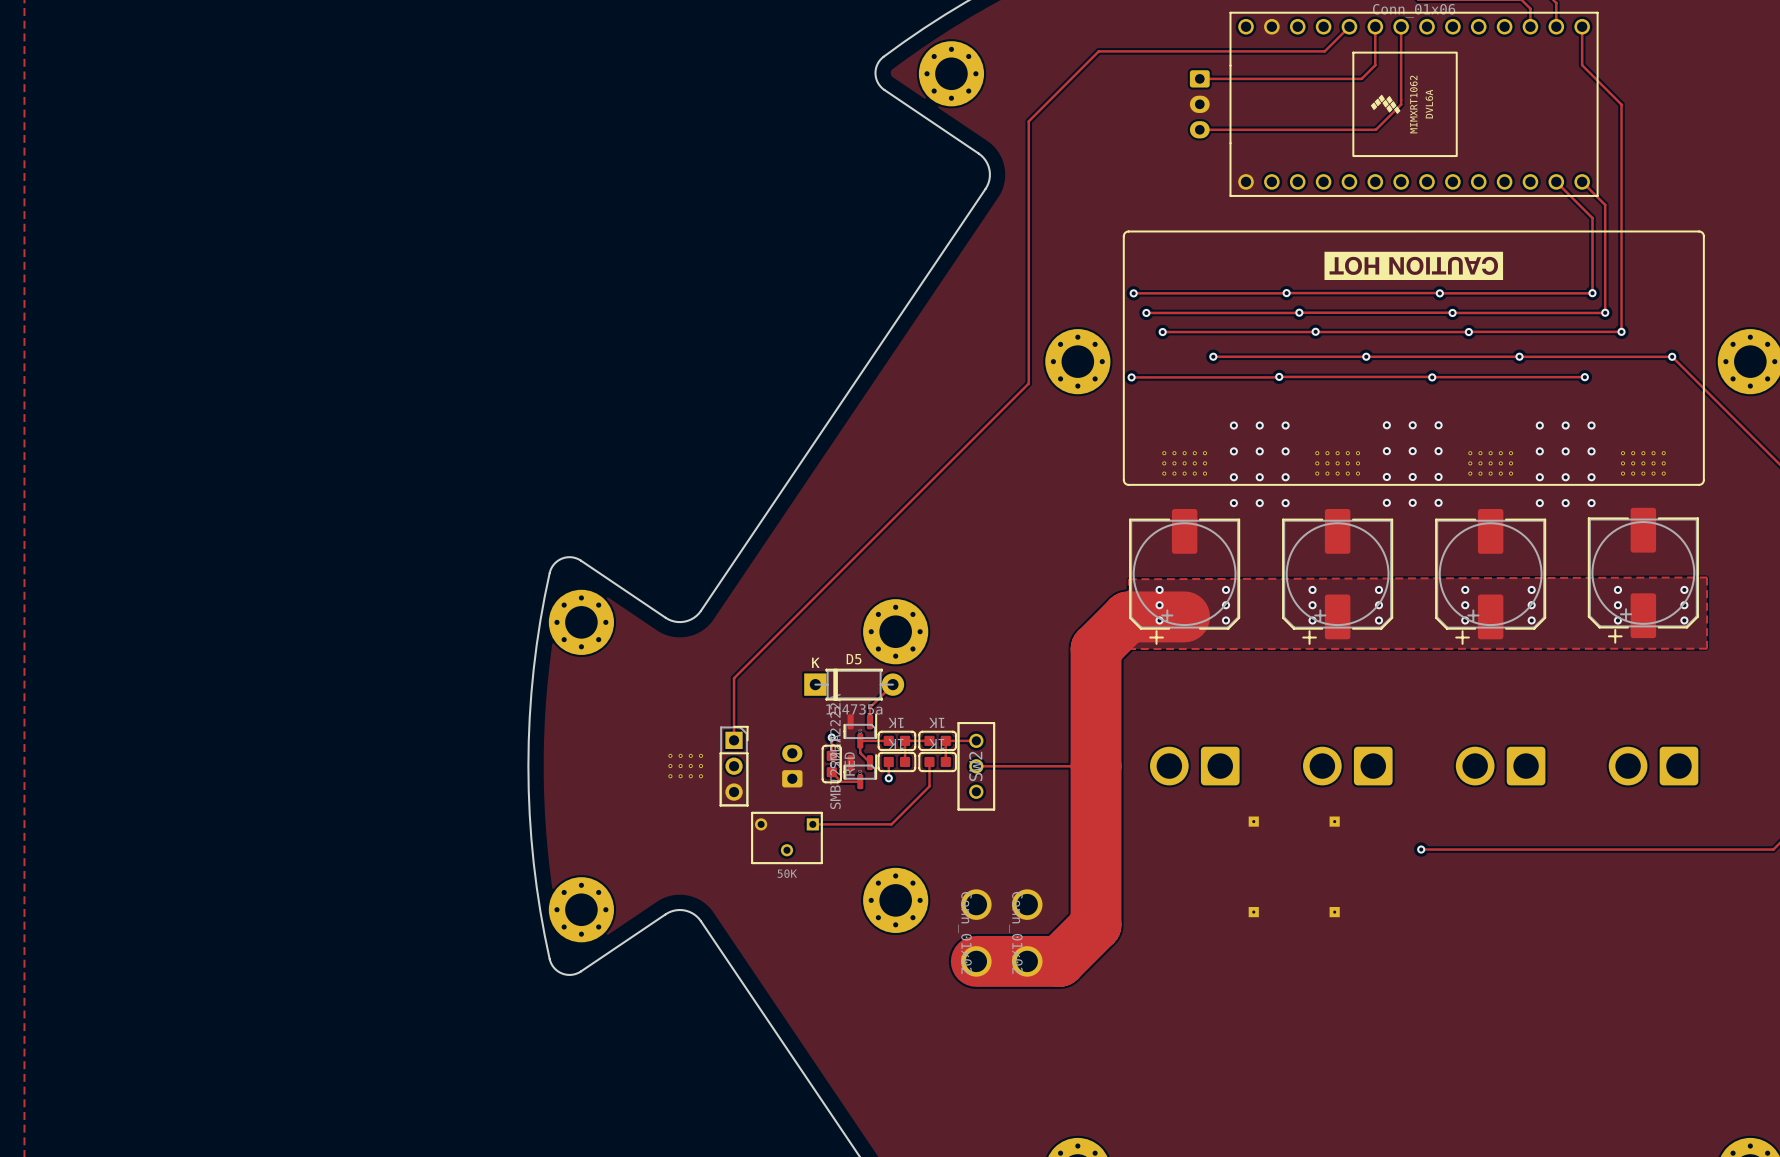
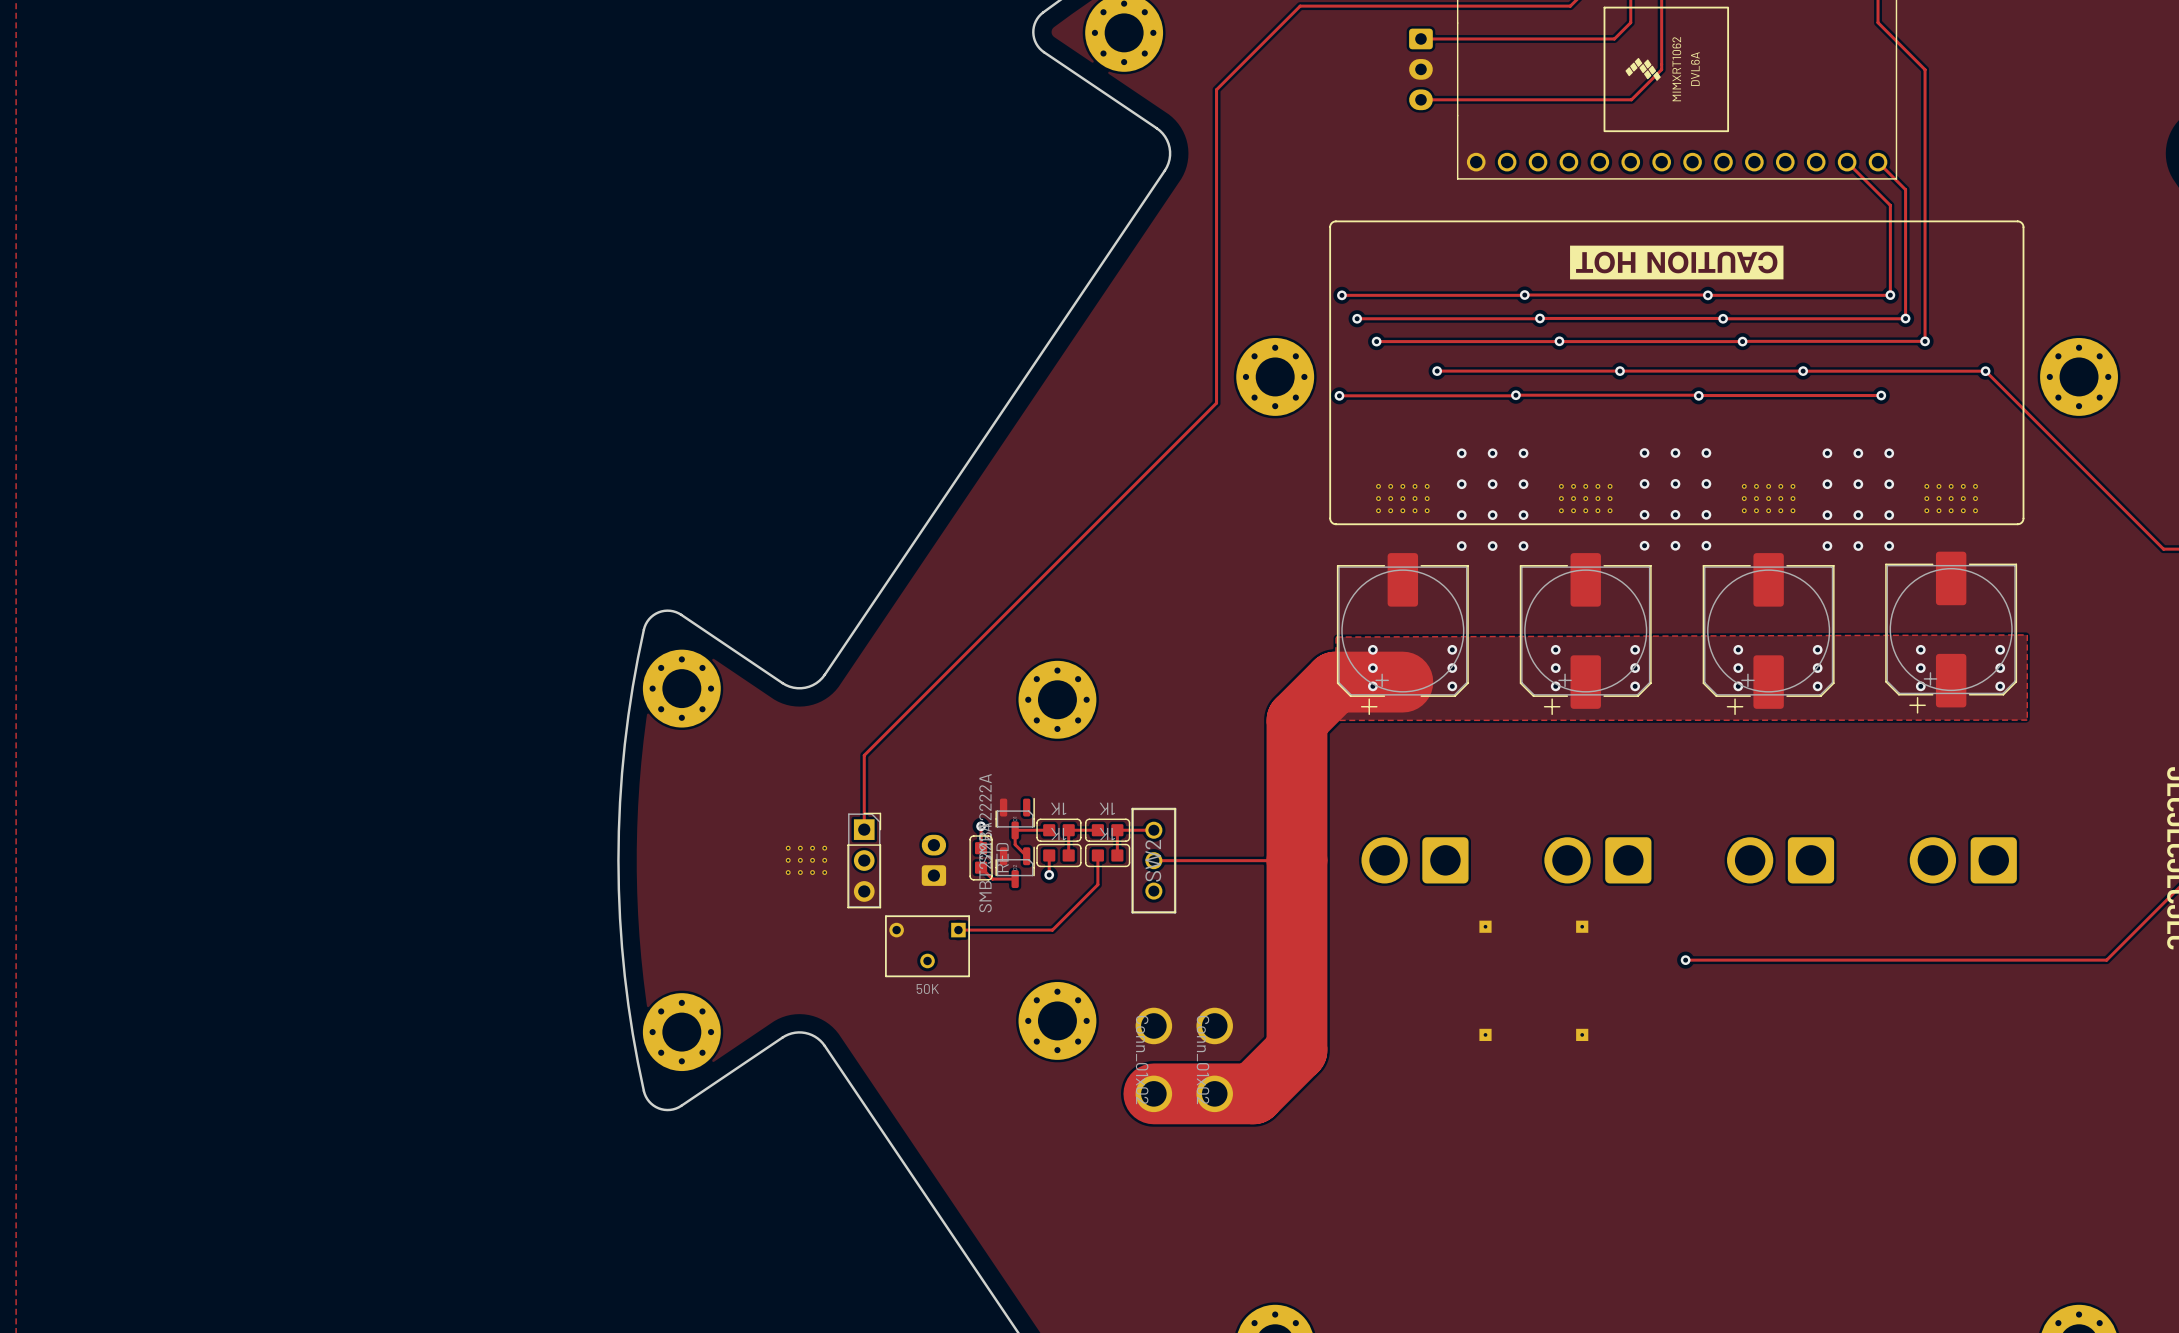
D5: 1n4735a (854, 684) -> none
track: (892, 684) (869, 707) (869, 721) -> none

